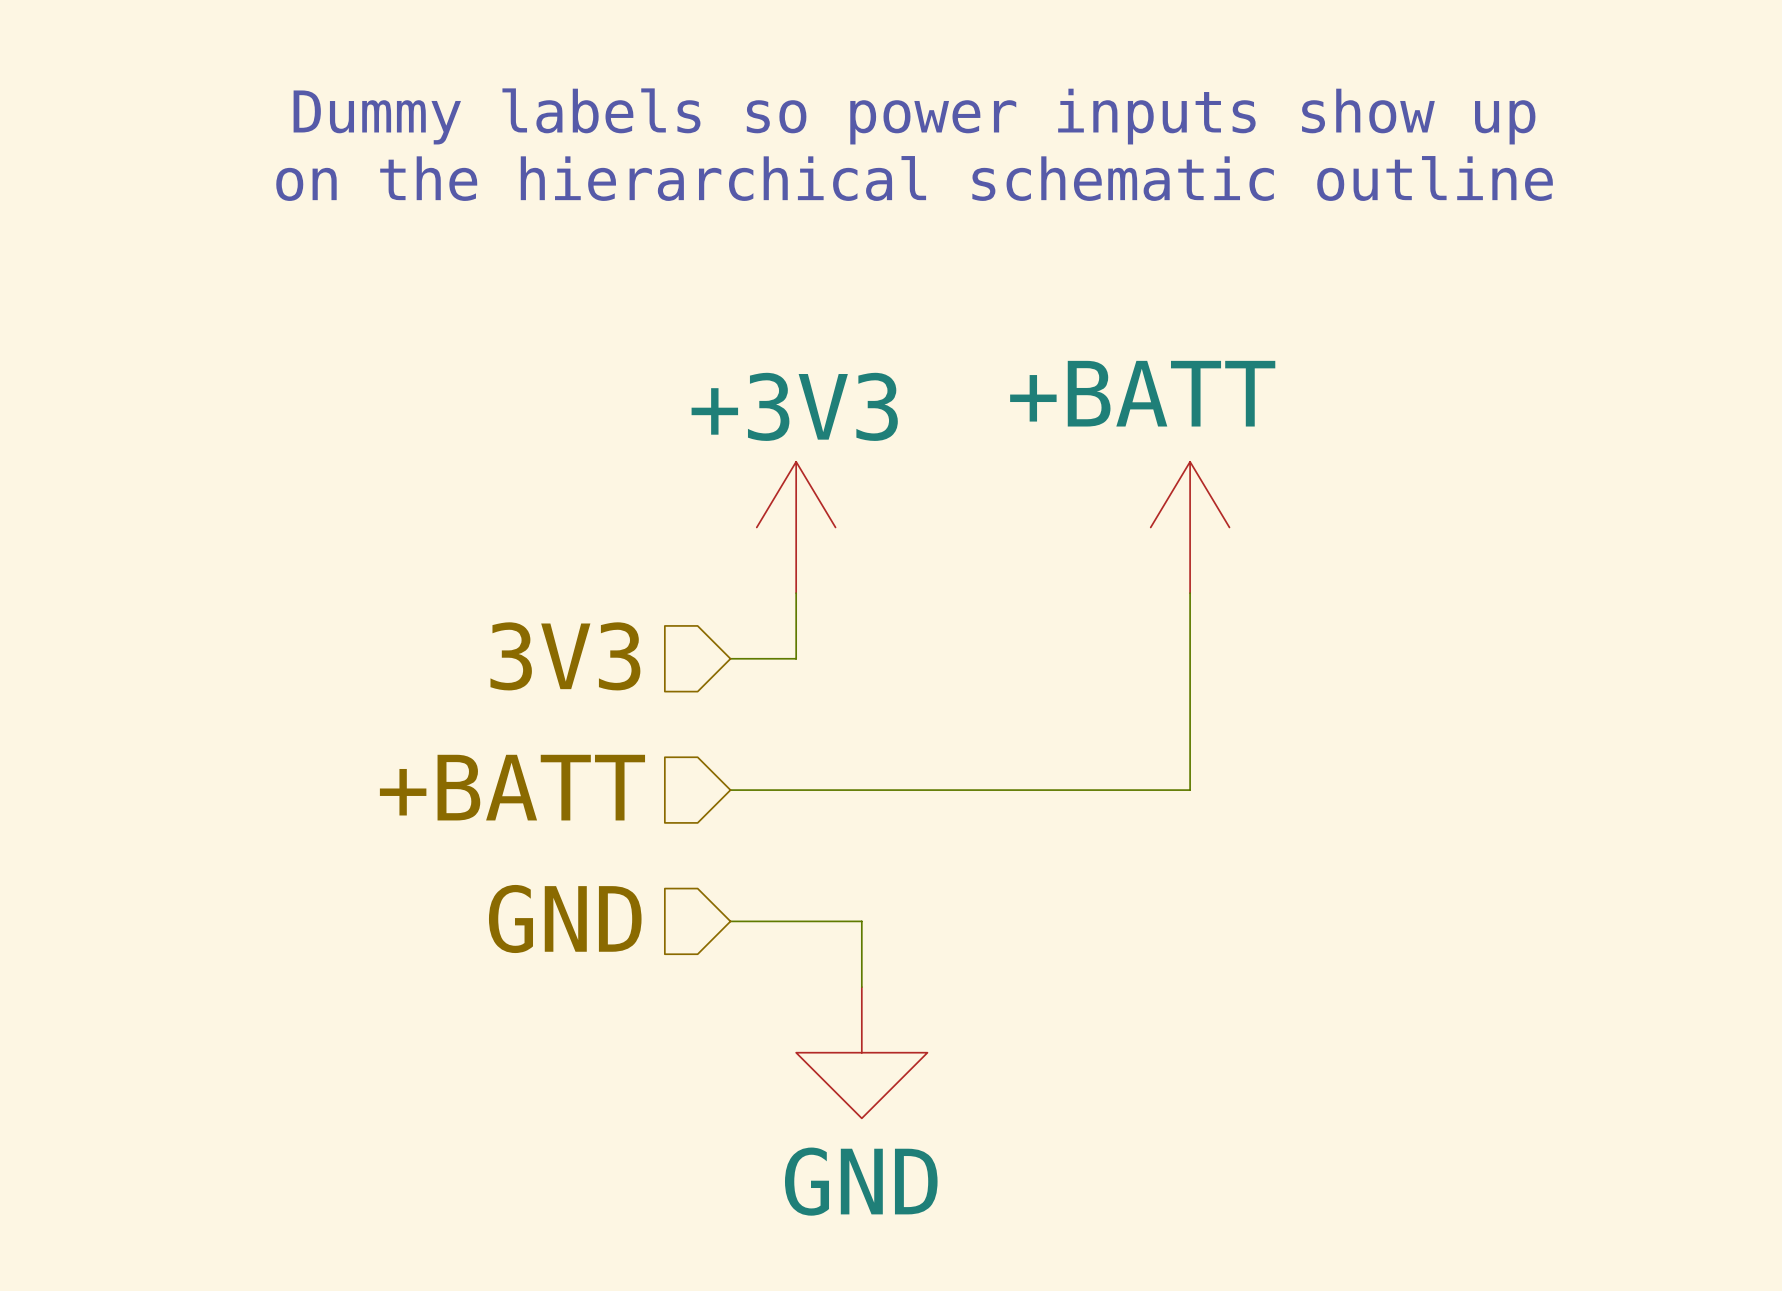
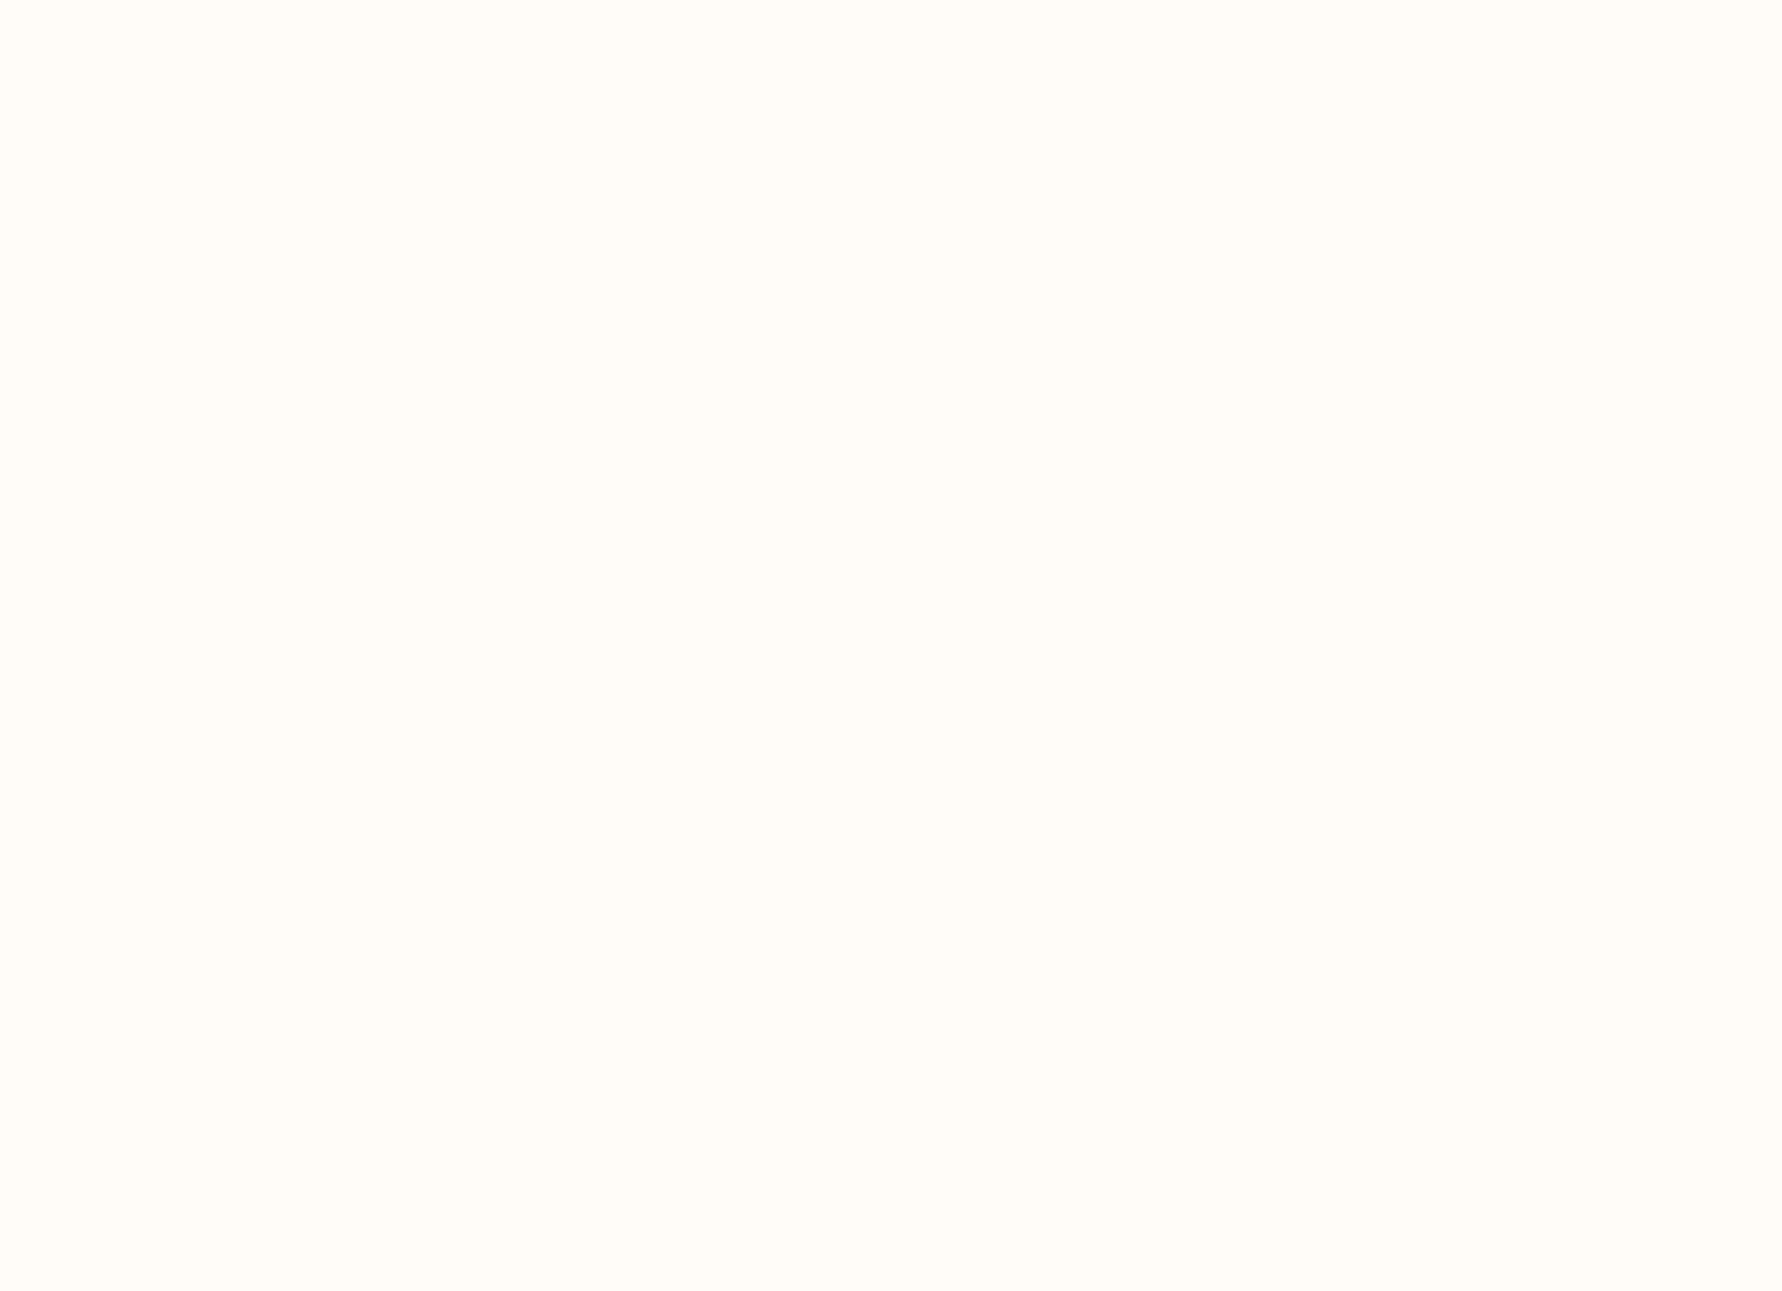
text: Dummy labels so power inputs show up (914, 116) -> none
text: on the hierarchical schematic outline (914, 178) -> none
power symbol: +3V3 (796, 527) -> none
power symbol: +BATT (1190, 527) -> none
wire: (796, 593) (796, 658) (730, 658) -> none
wire: (1190, 593) (1190, 790) (730, 790) -> none
hierarchical label: 3V3 (565, 656) -> none
hierarchical label: +BATT (512, 787) -> none
hierarchical label: GND (565, 918) -> none
wire: (730, 921) (861, 921) (861, 987) -> none
power symbol: GND (861, 1052) -> none

